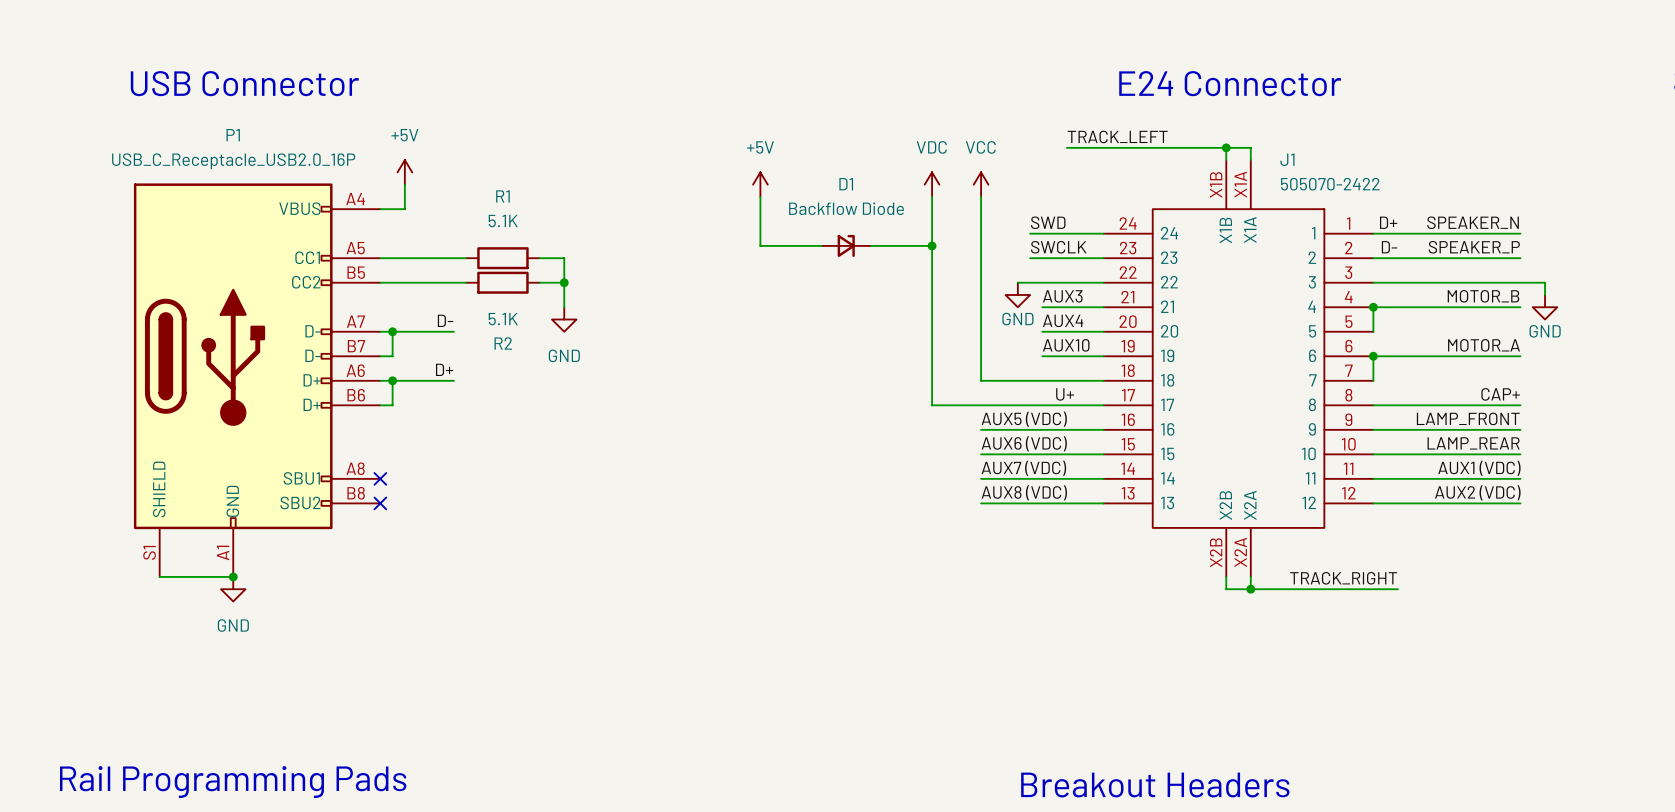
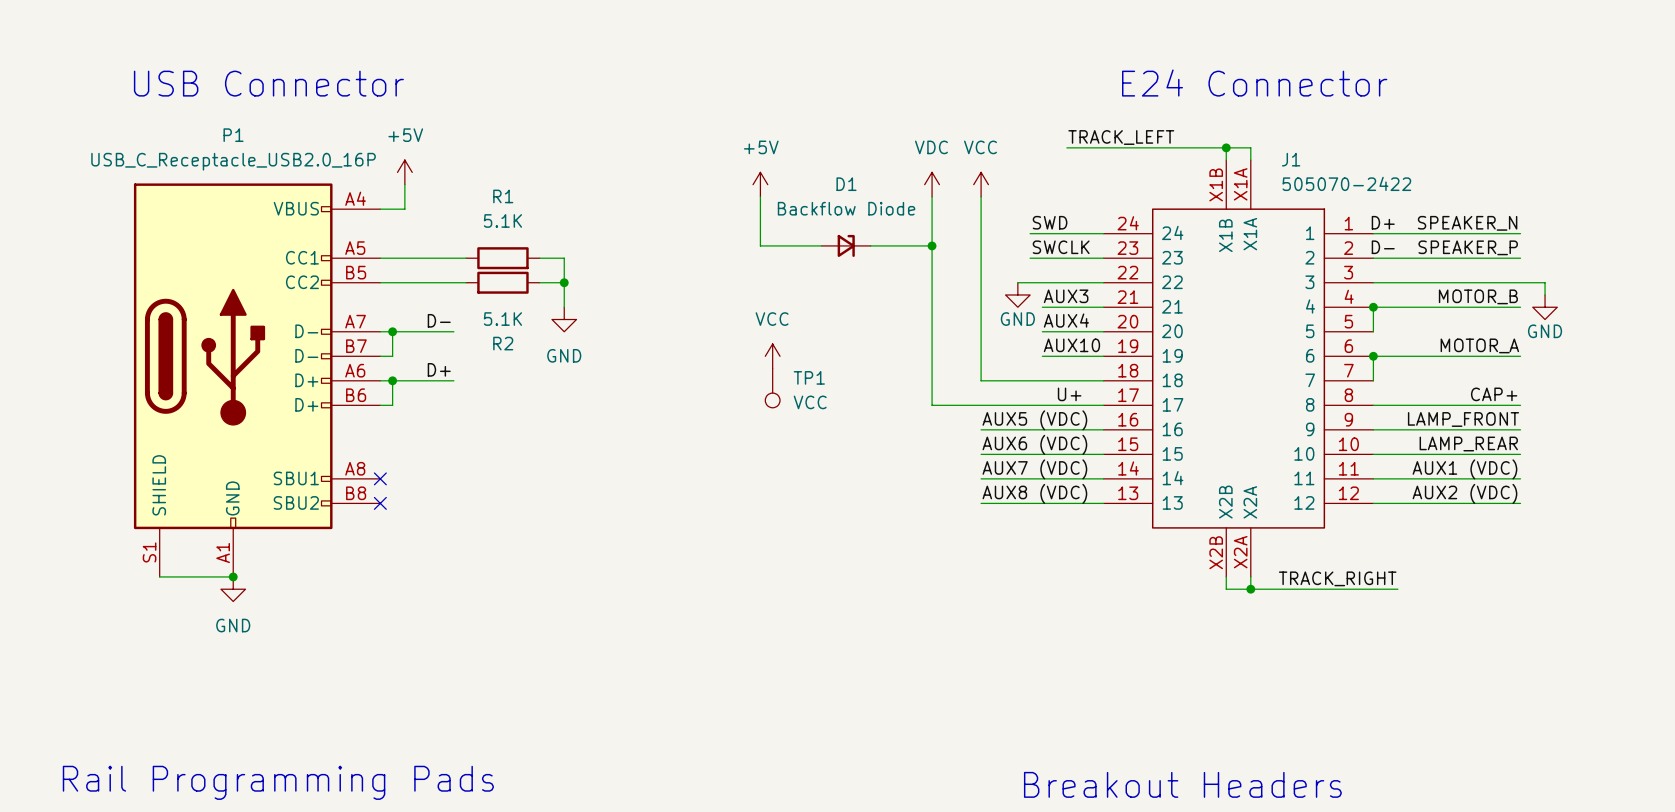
power symbol: none -> VCC (772, 356)
TP1: none -> VCC (772, 388)

